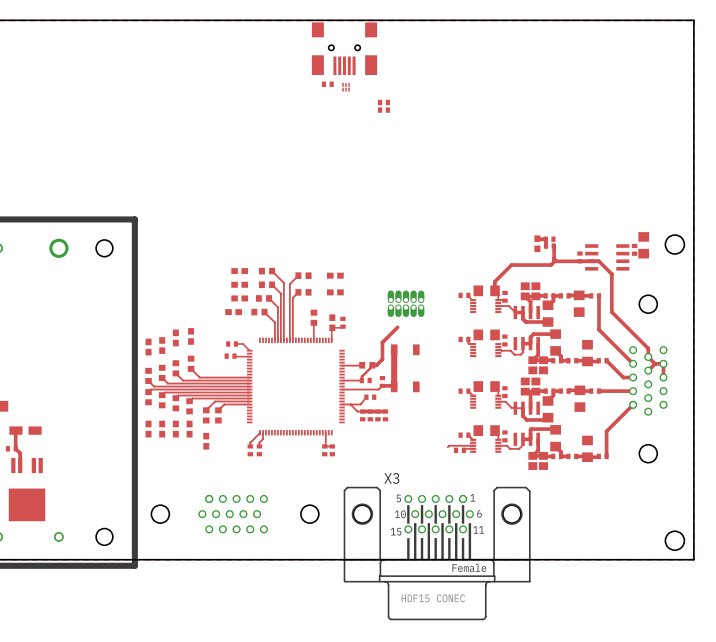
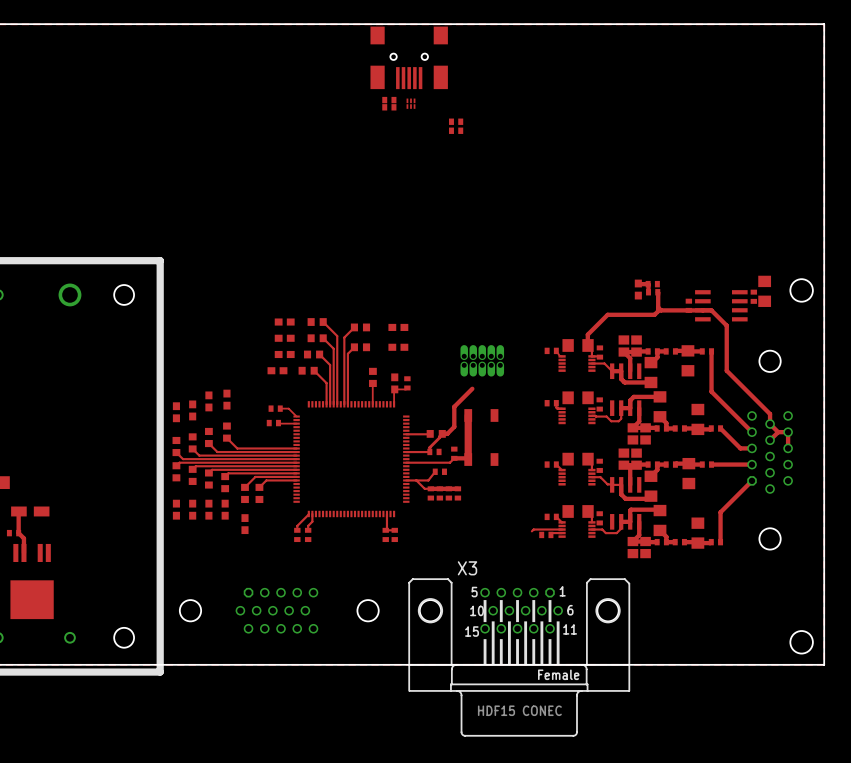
part: none -> (389, 107)

